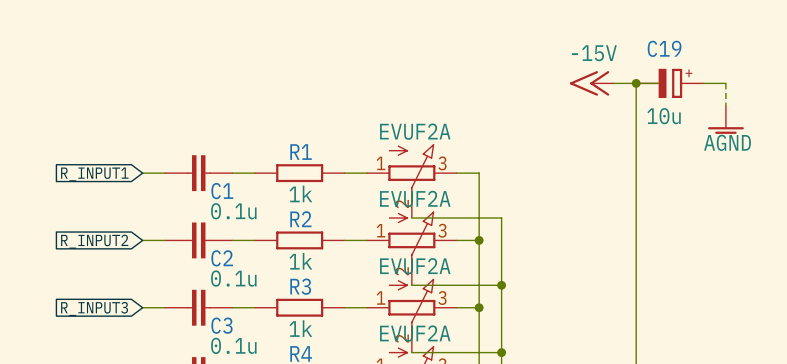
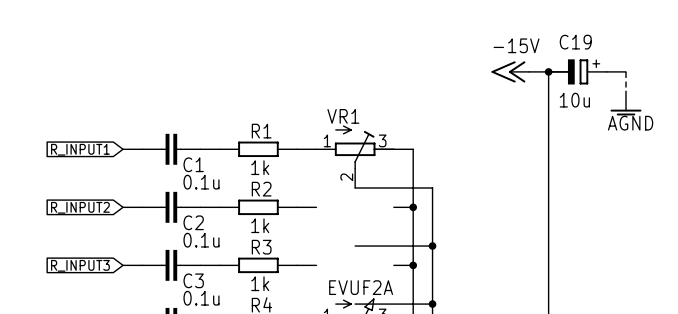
part: EVUF2A (411, 181) -> none
VR1: none -> (355, 156)
part: EVUF2A (411, 248) -> none
part: EVUF2A (411, 315) -> none

